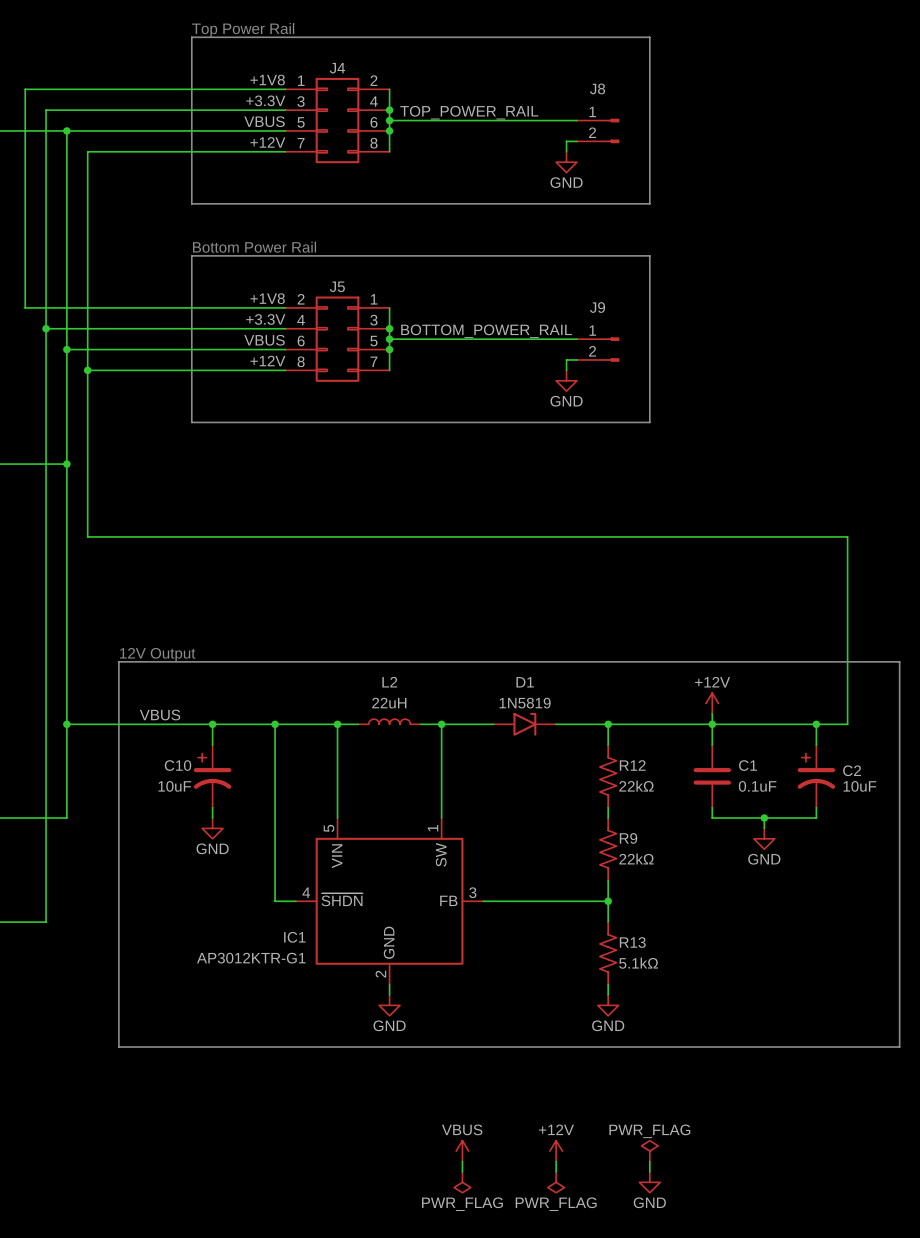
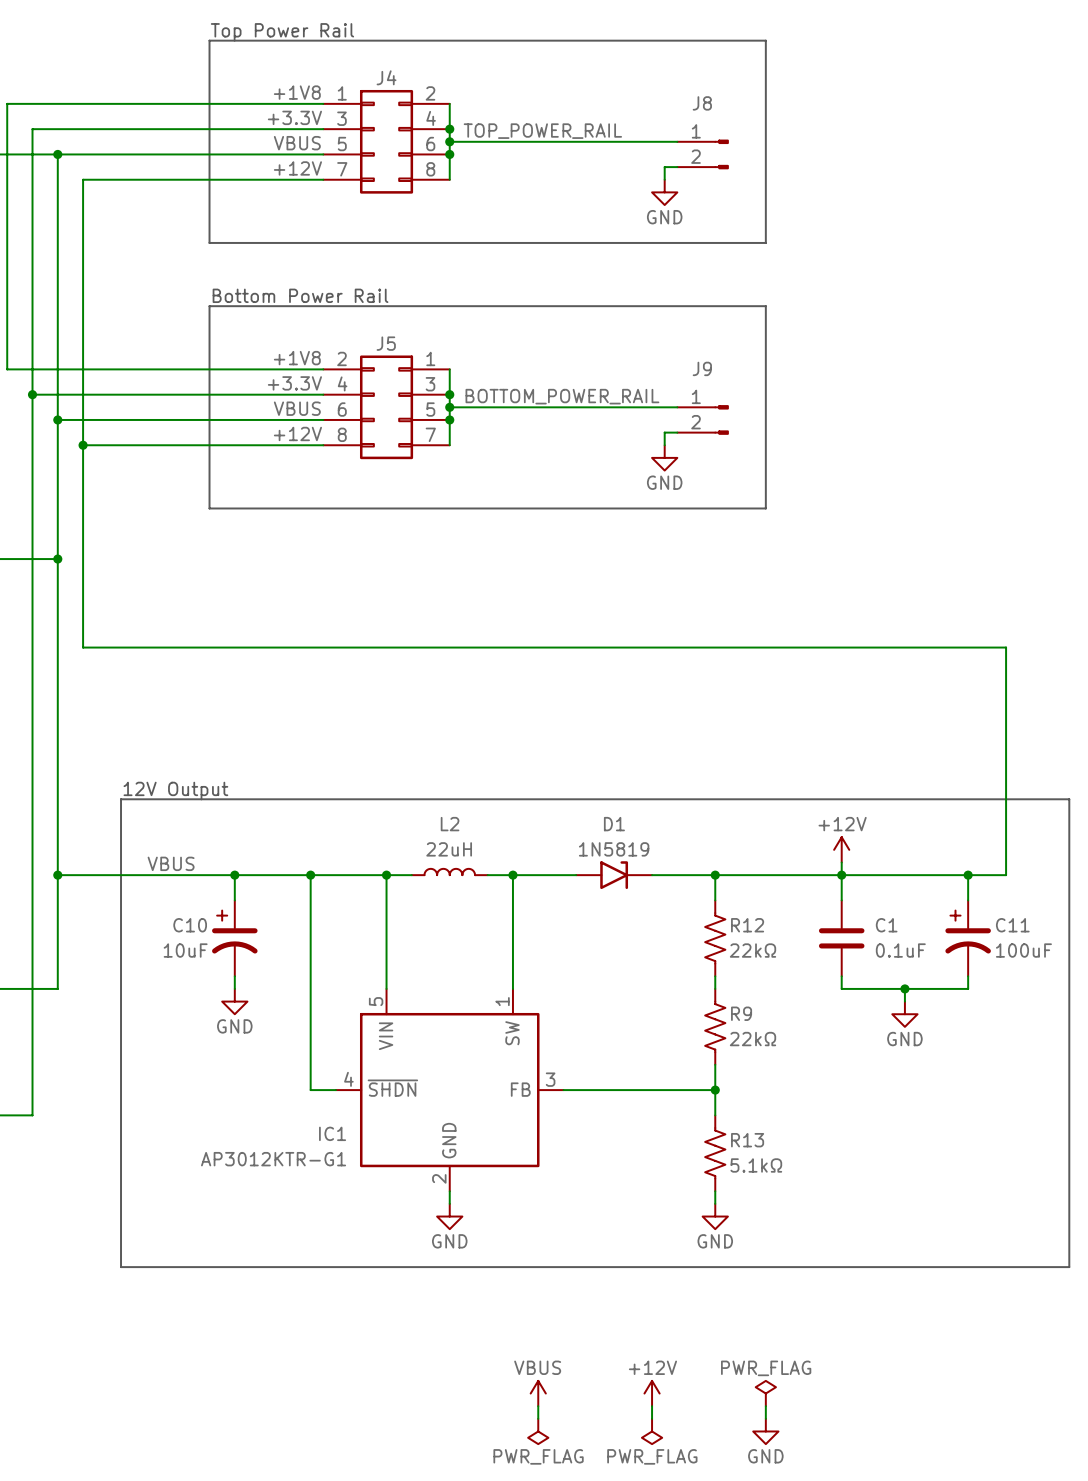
C2 name: C2 (852, 770) -> C11 (1012, 925)
C2 value: 10uF (859, 786) -> 100uF (1023, 950)

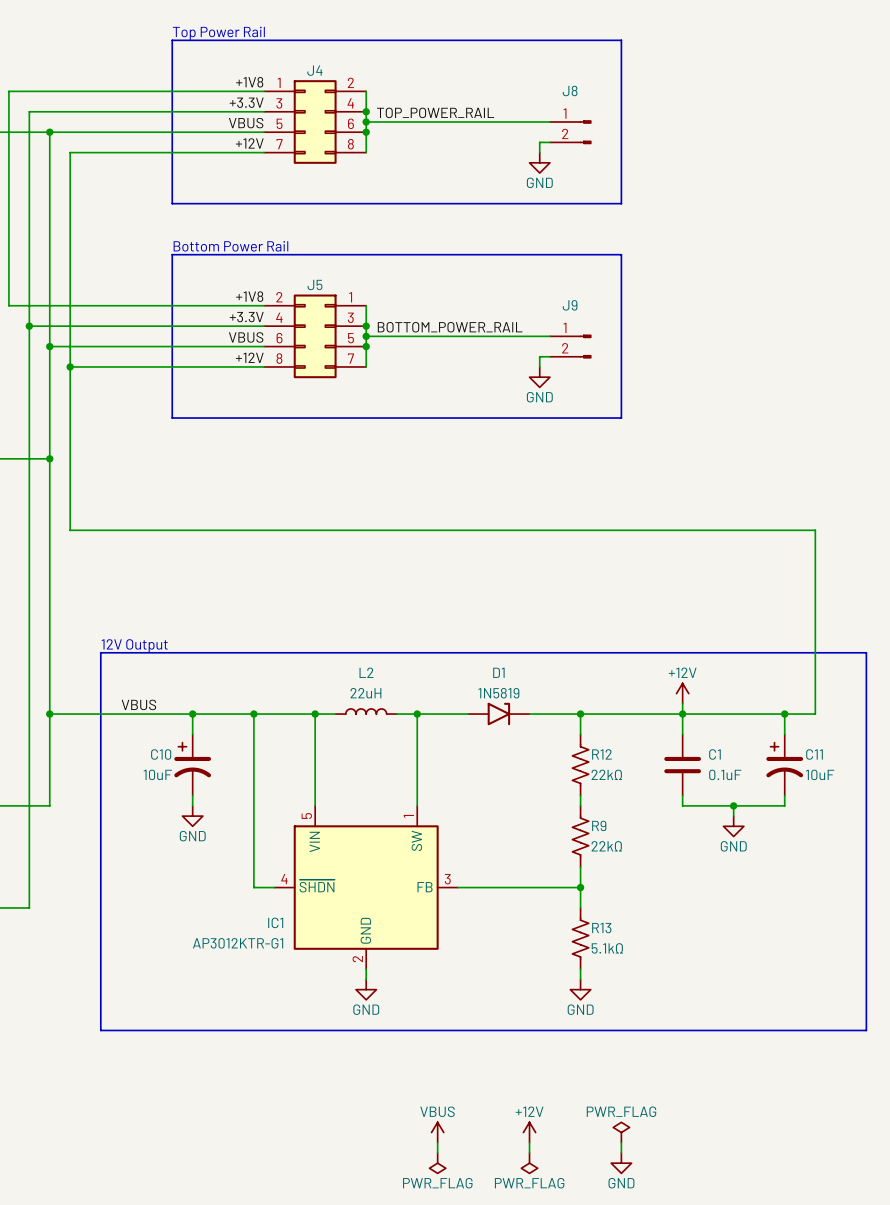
C11 value: 100uF (1023, 950) -> 10uF (820, 774)

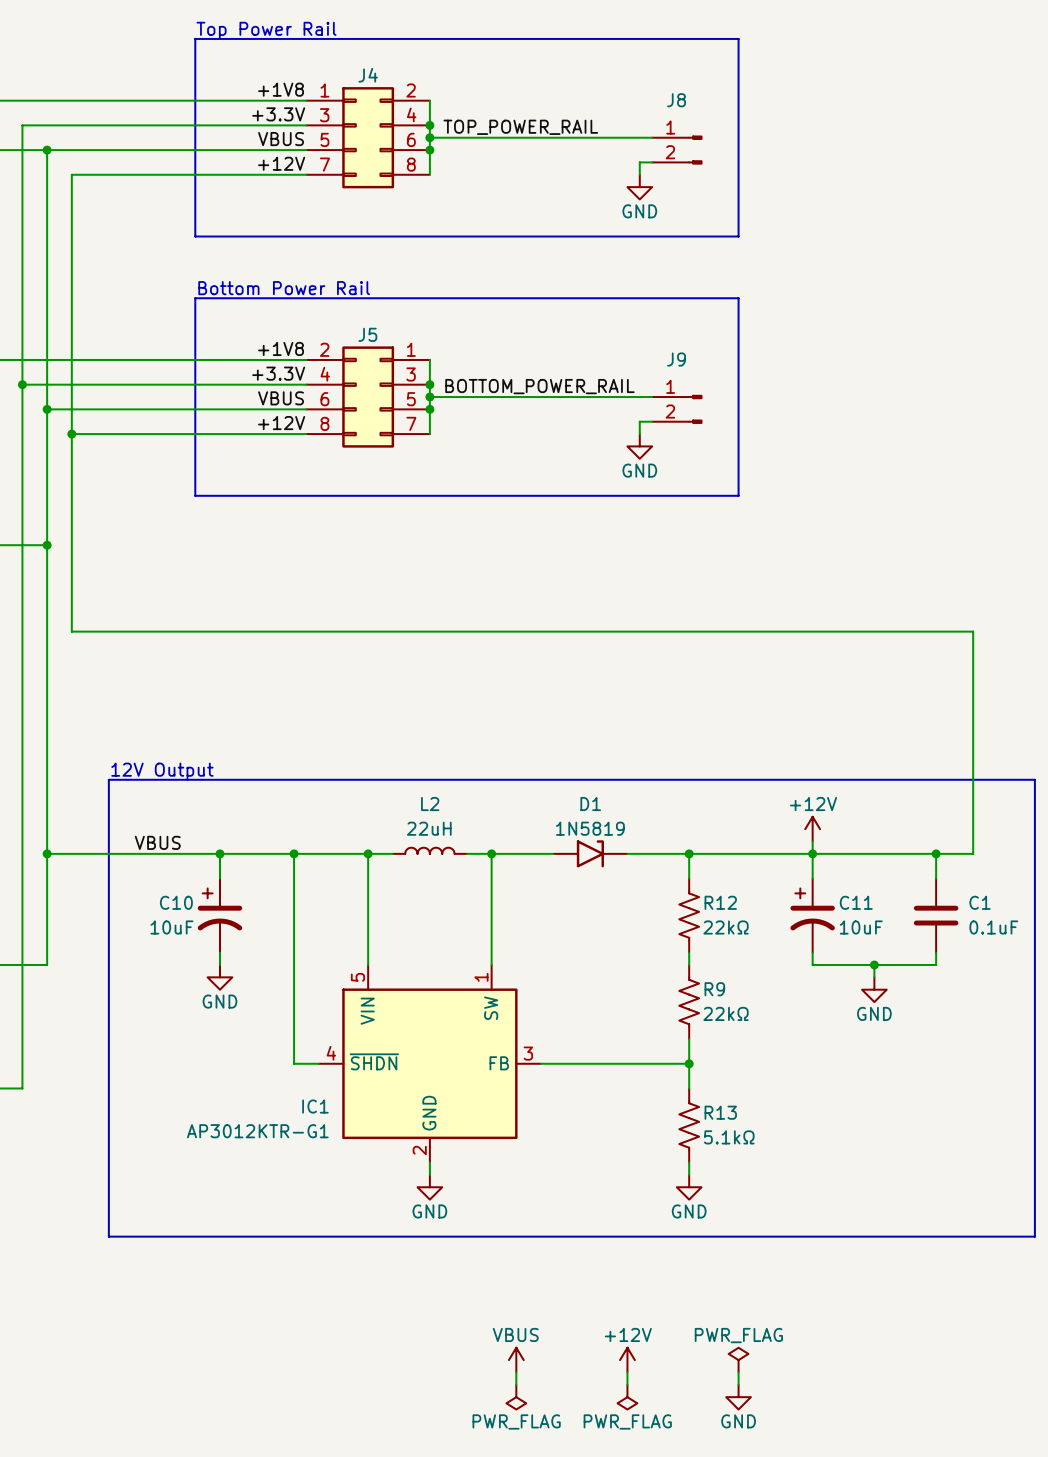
C1 position: (682, 765) -> (936, 915)
C11 position: (784, 765) -> (812, 915)

